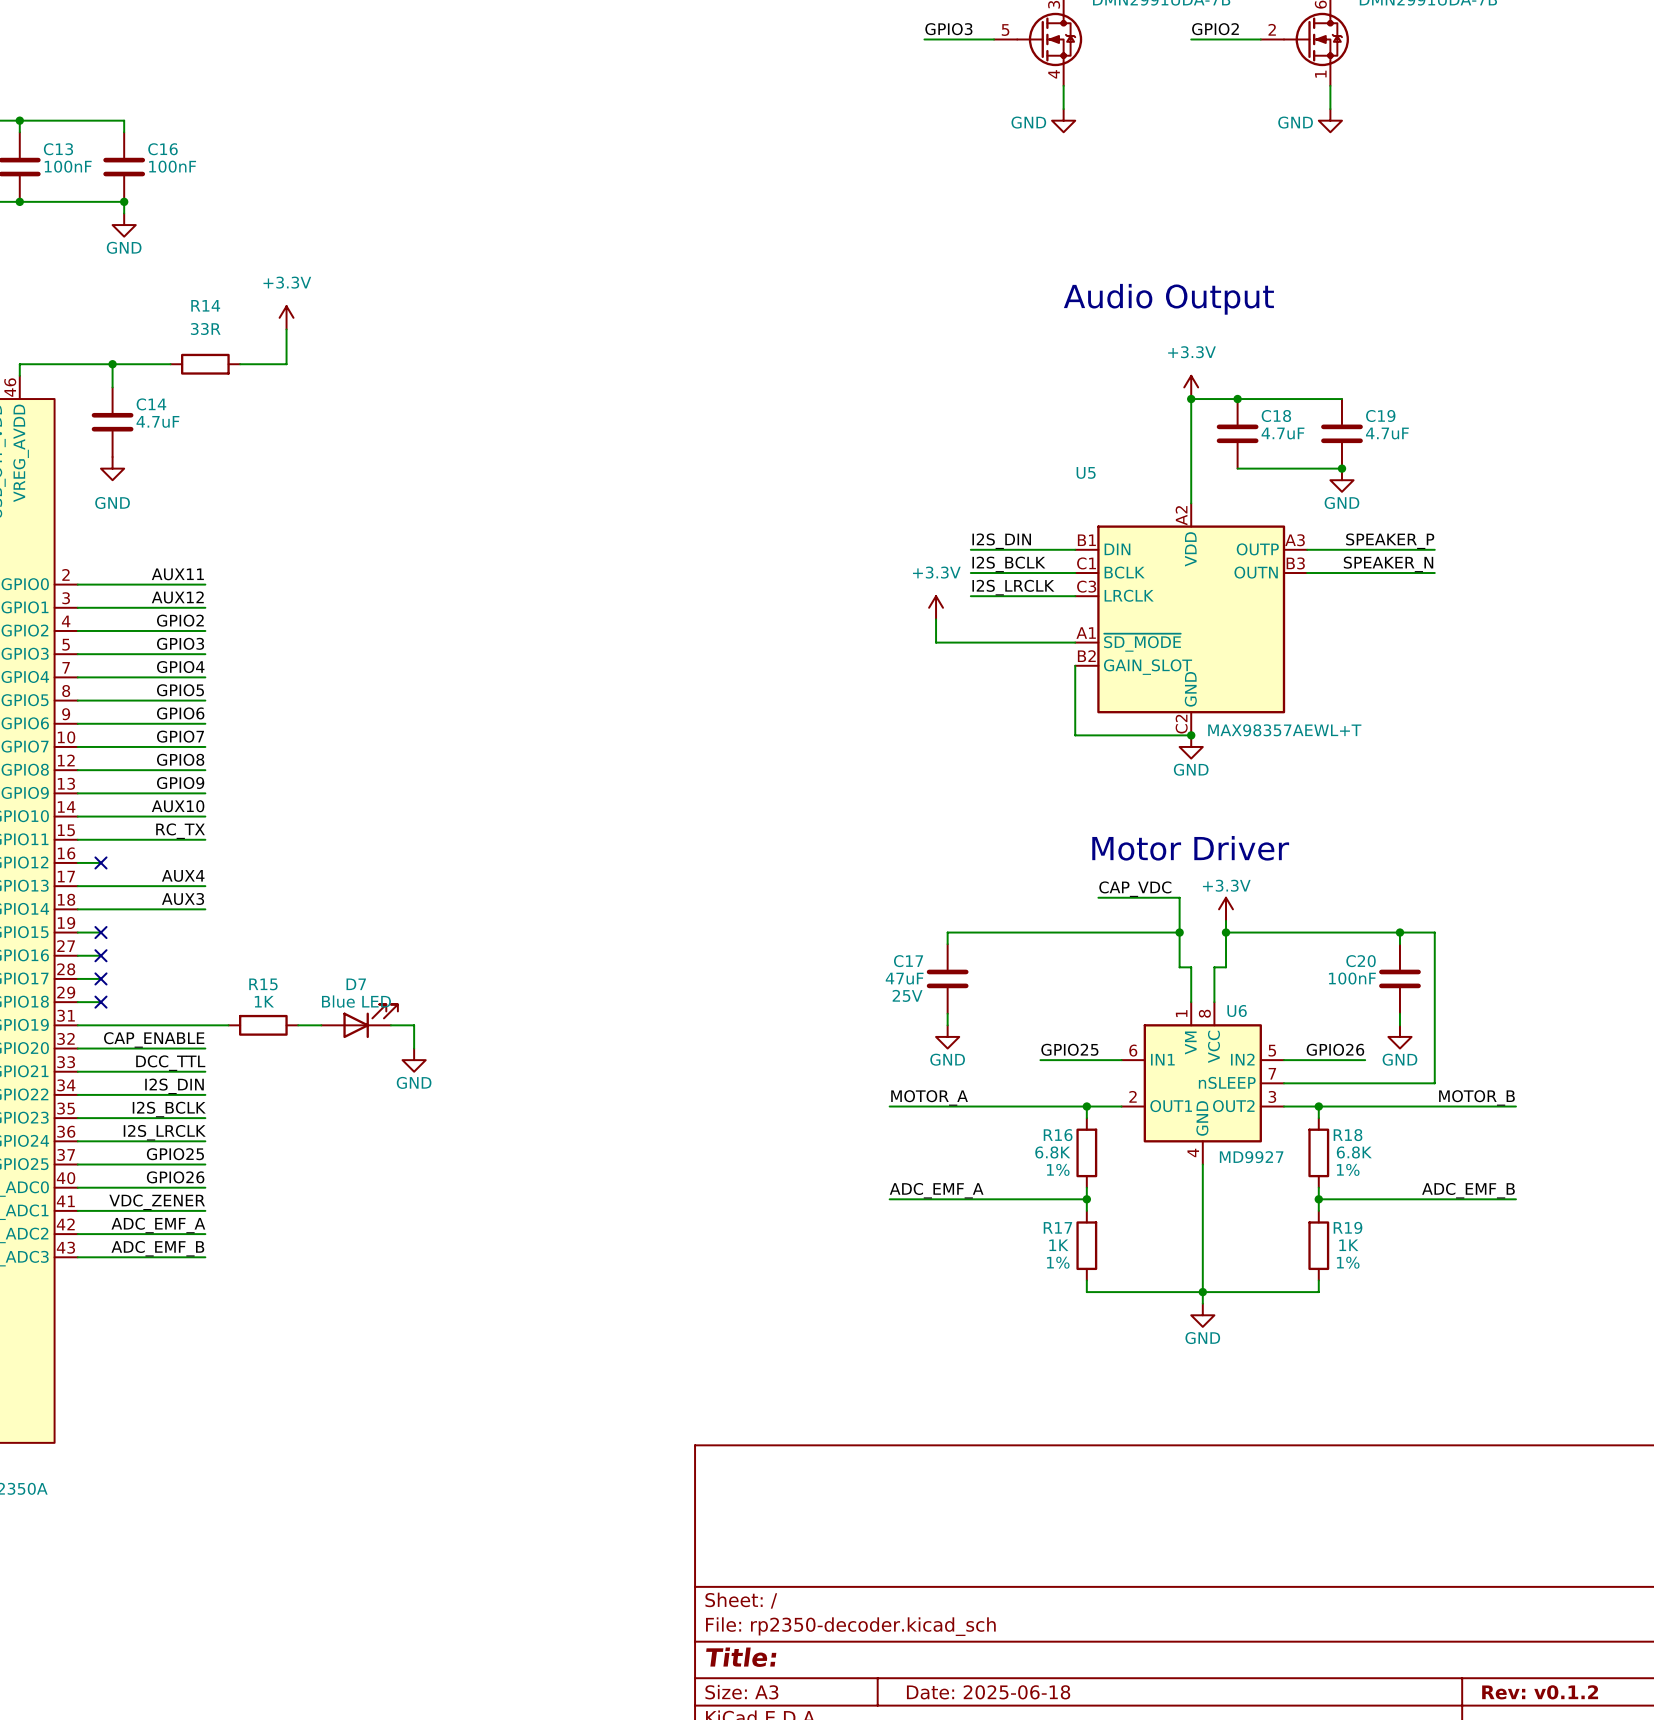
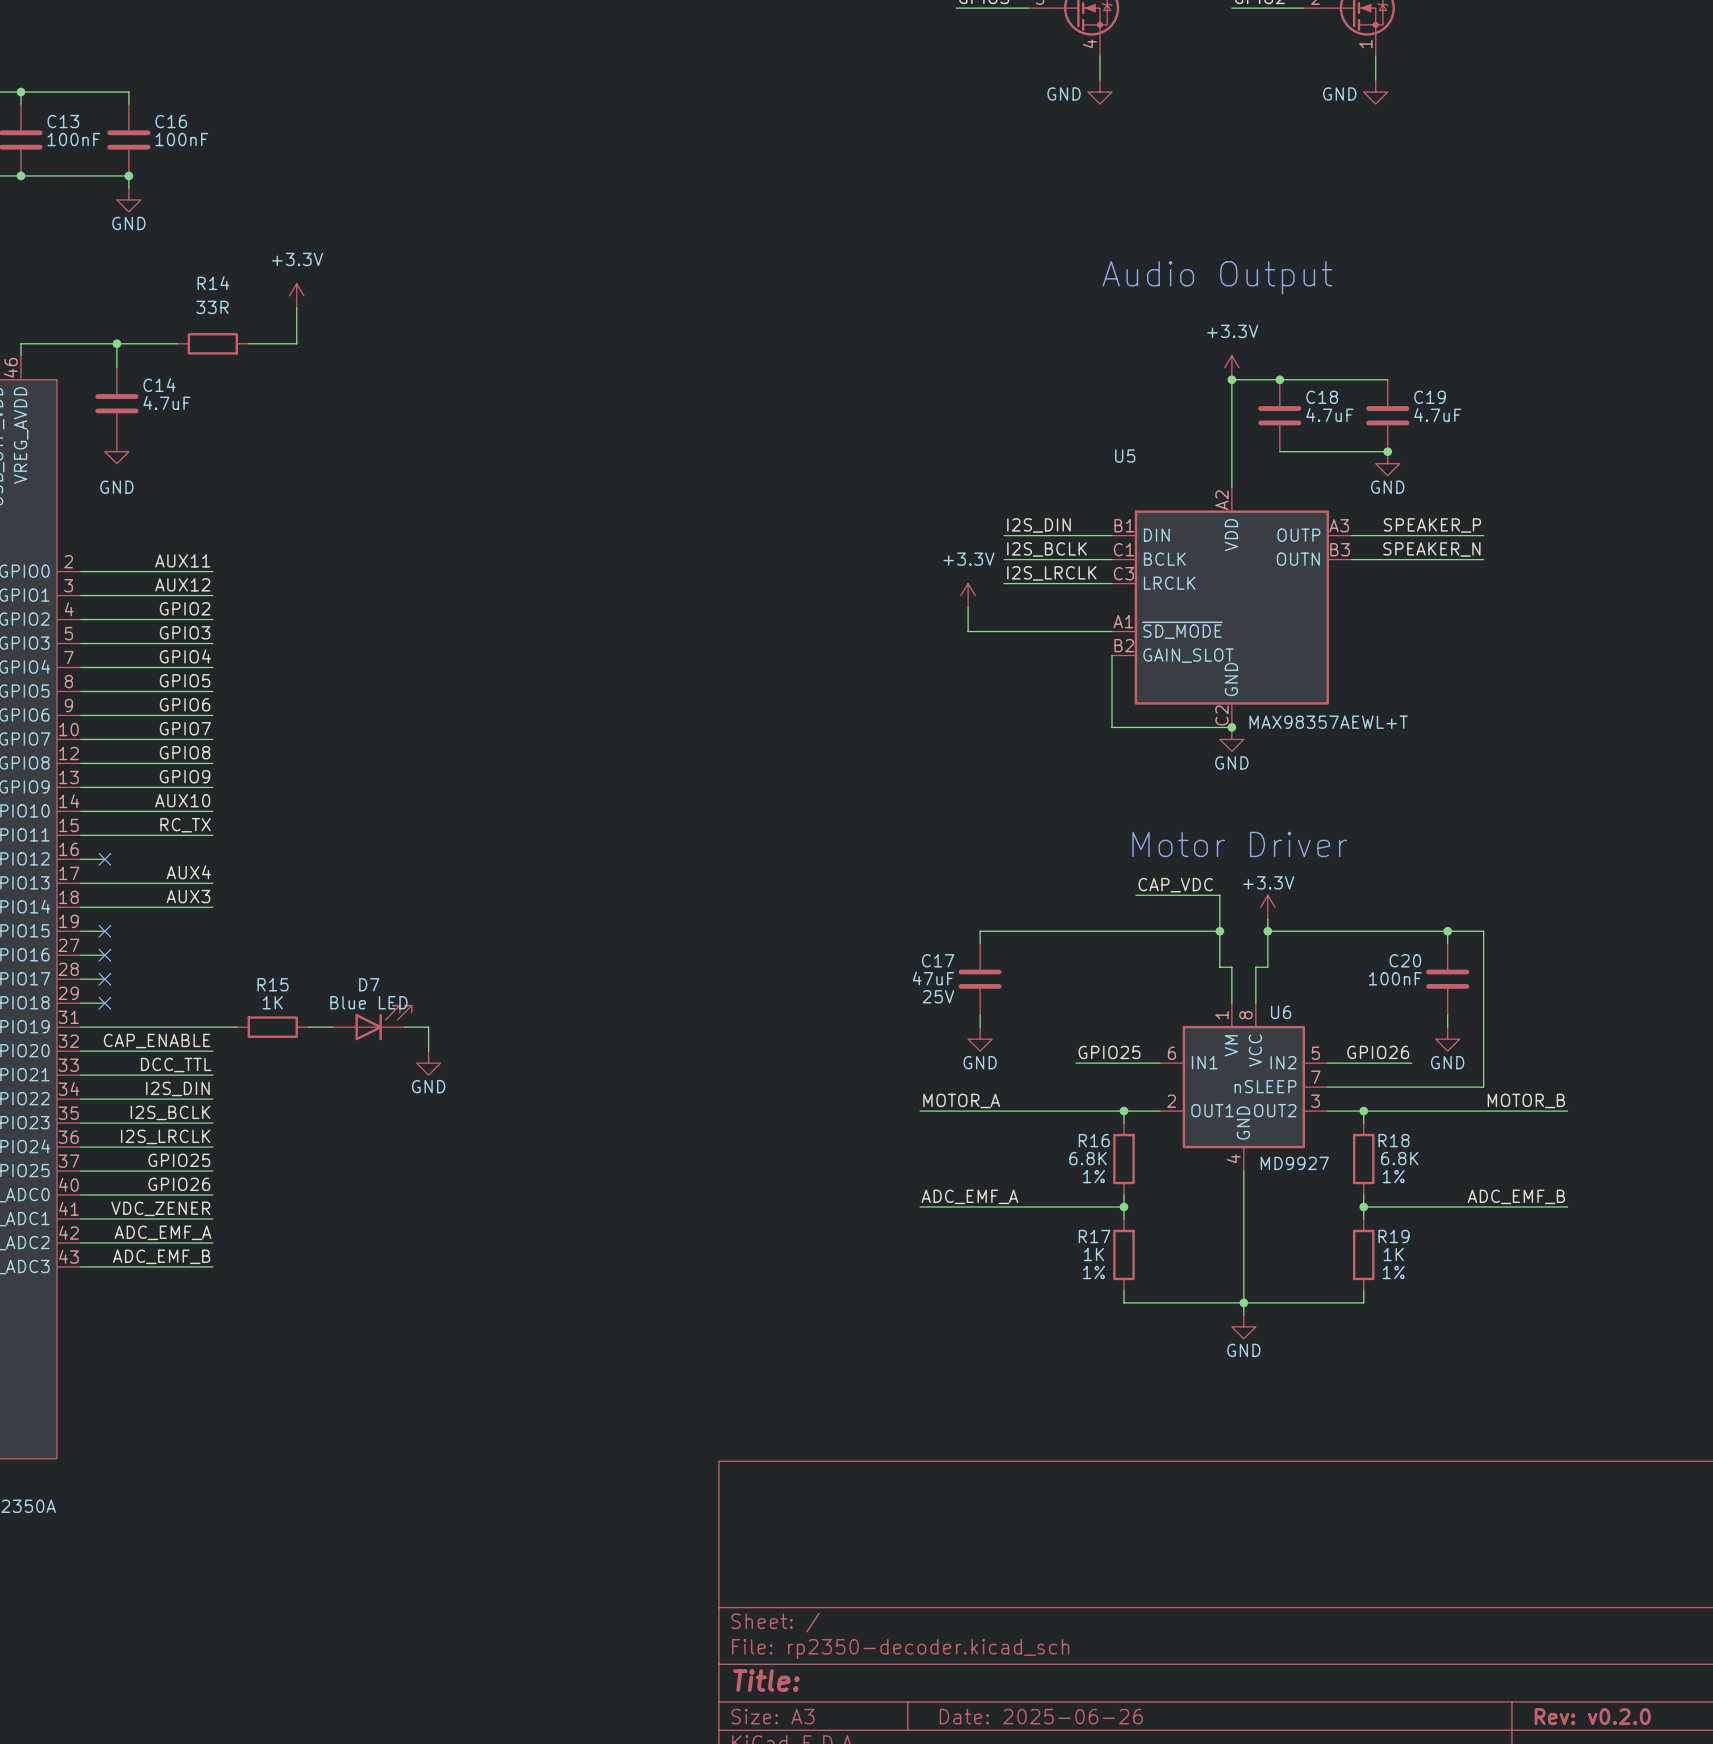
title block: Date: 2025-06-18 (988, 1692) -> Date: 2025-06-26 (1041, 1716)
title block: Rev: v0.1.2 (1540, 1692) -> Rev: v0.2.0 (1592, 1716)

